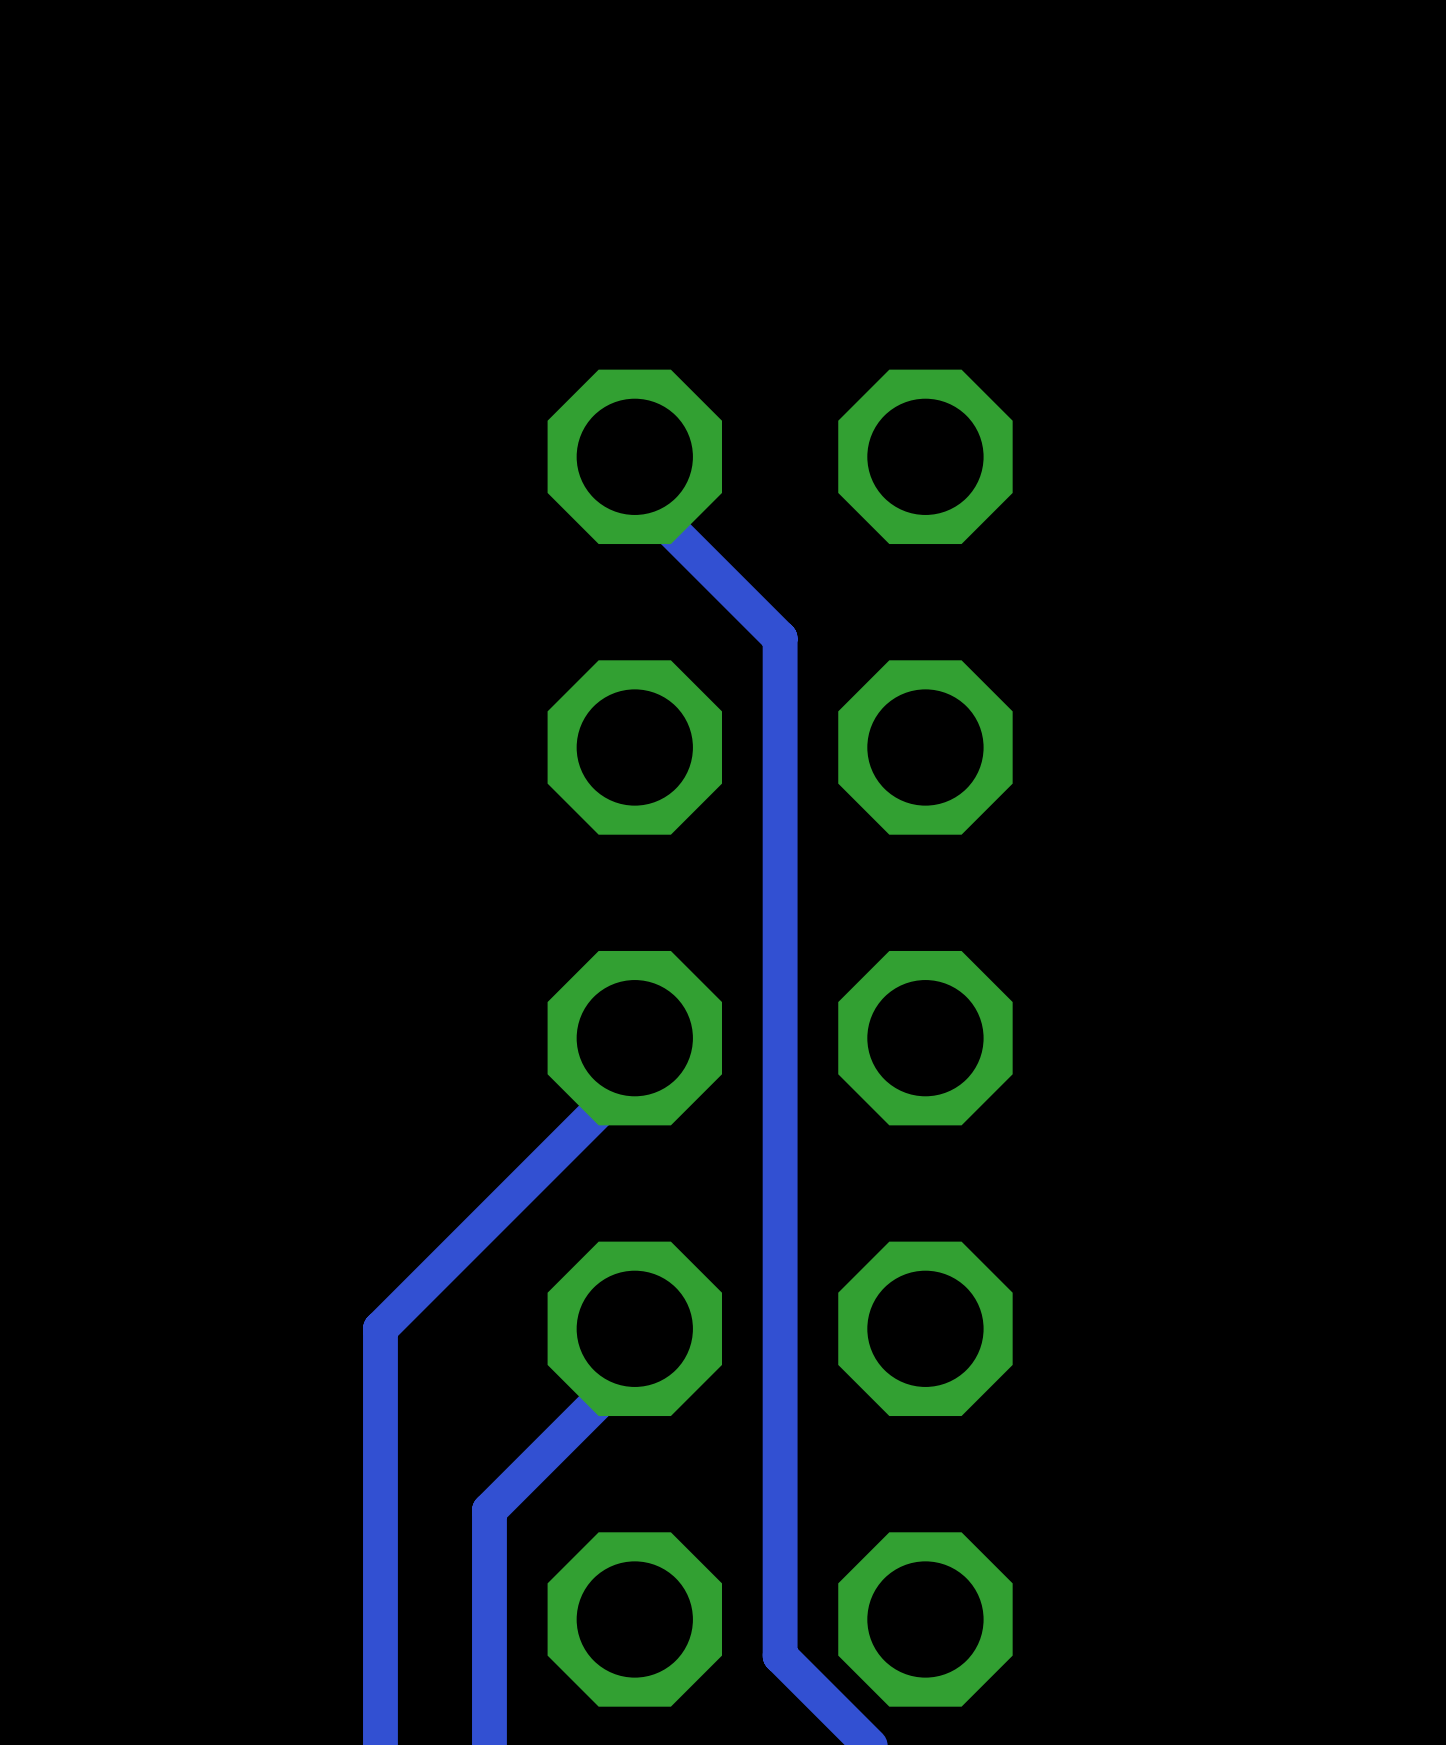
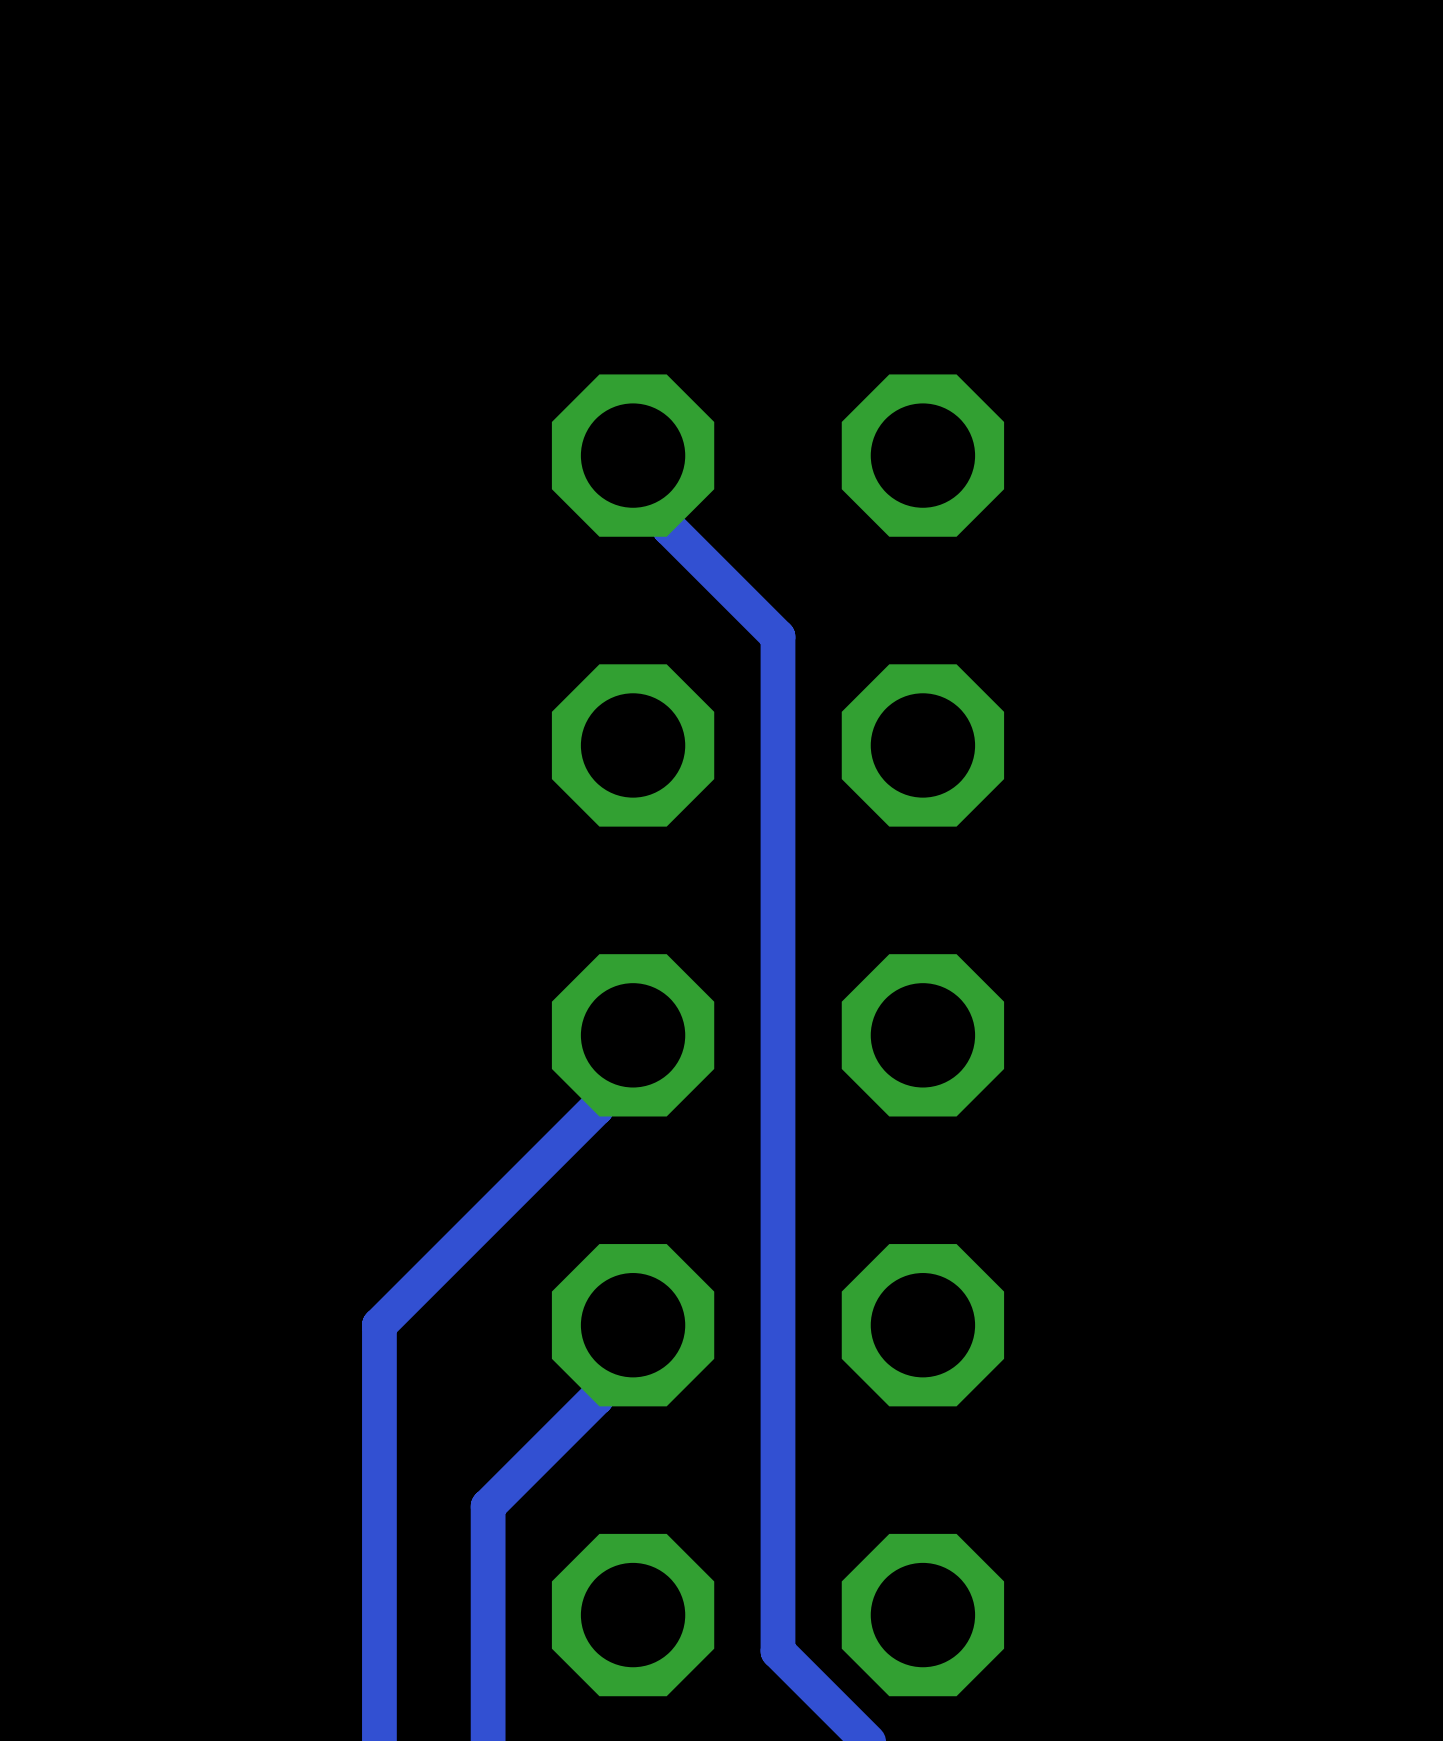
part footprint: [547, 369, 1013, 1707] -> [551, 374, 1005, 1697]

